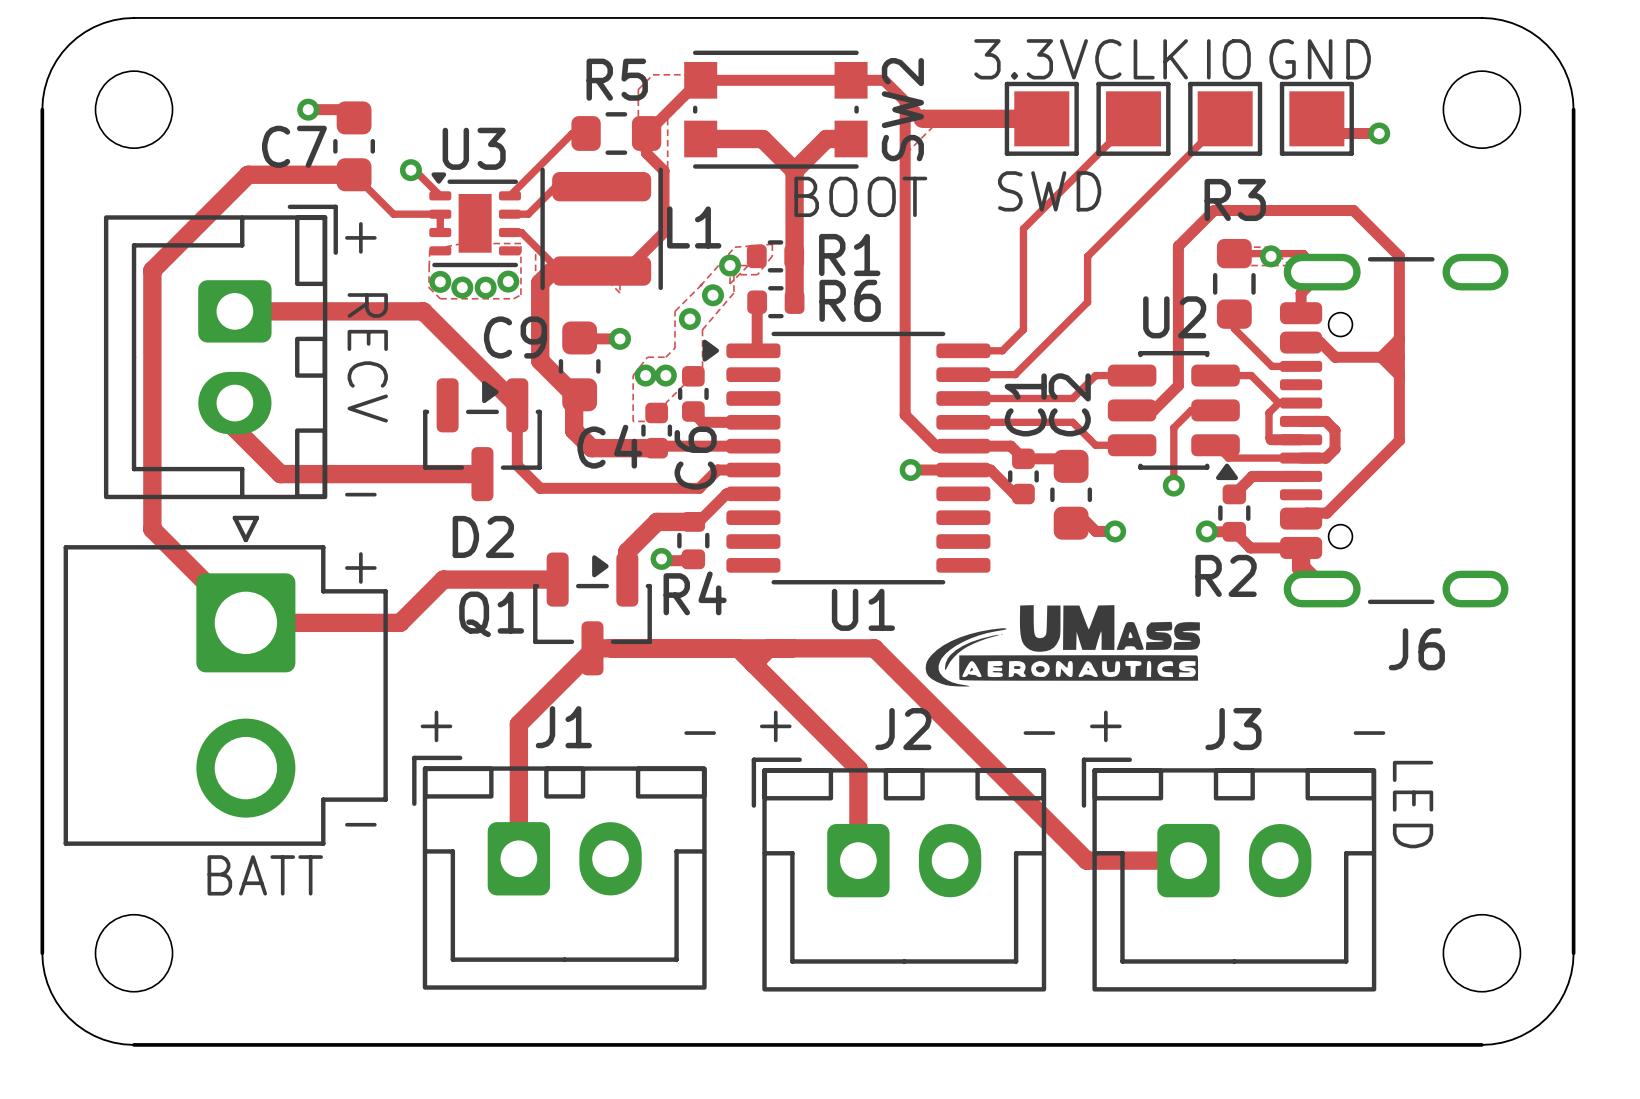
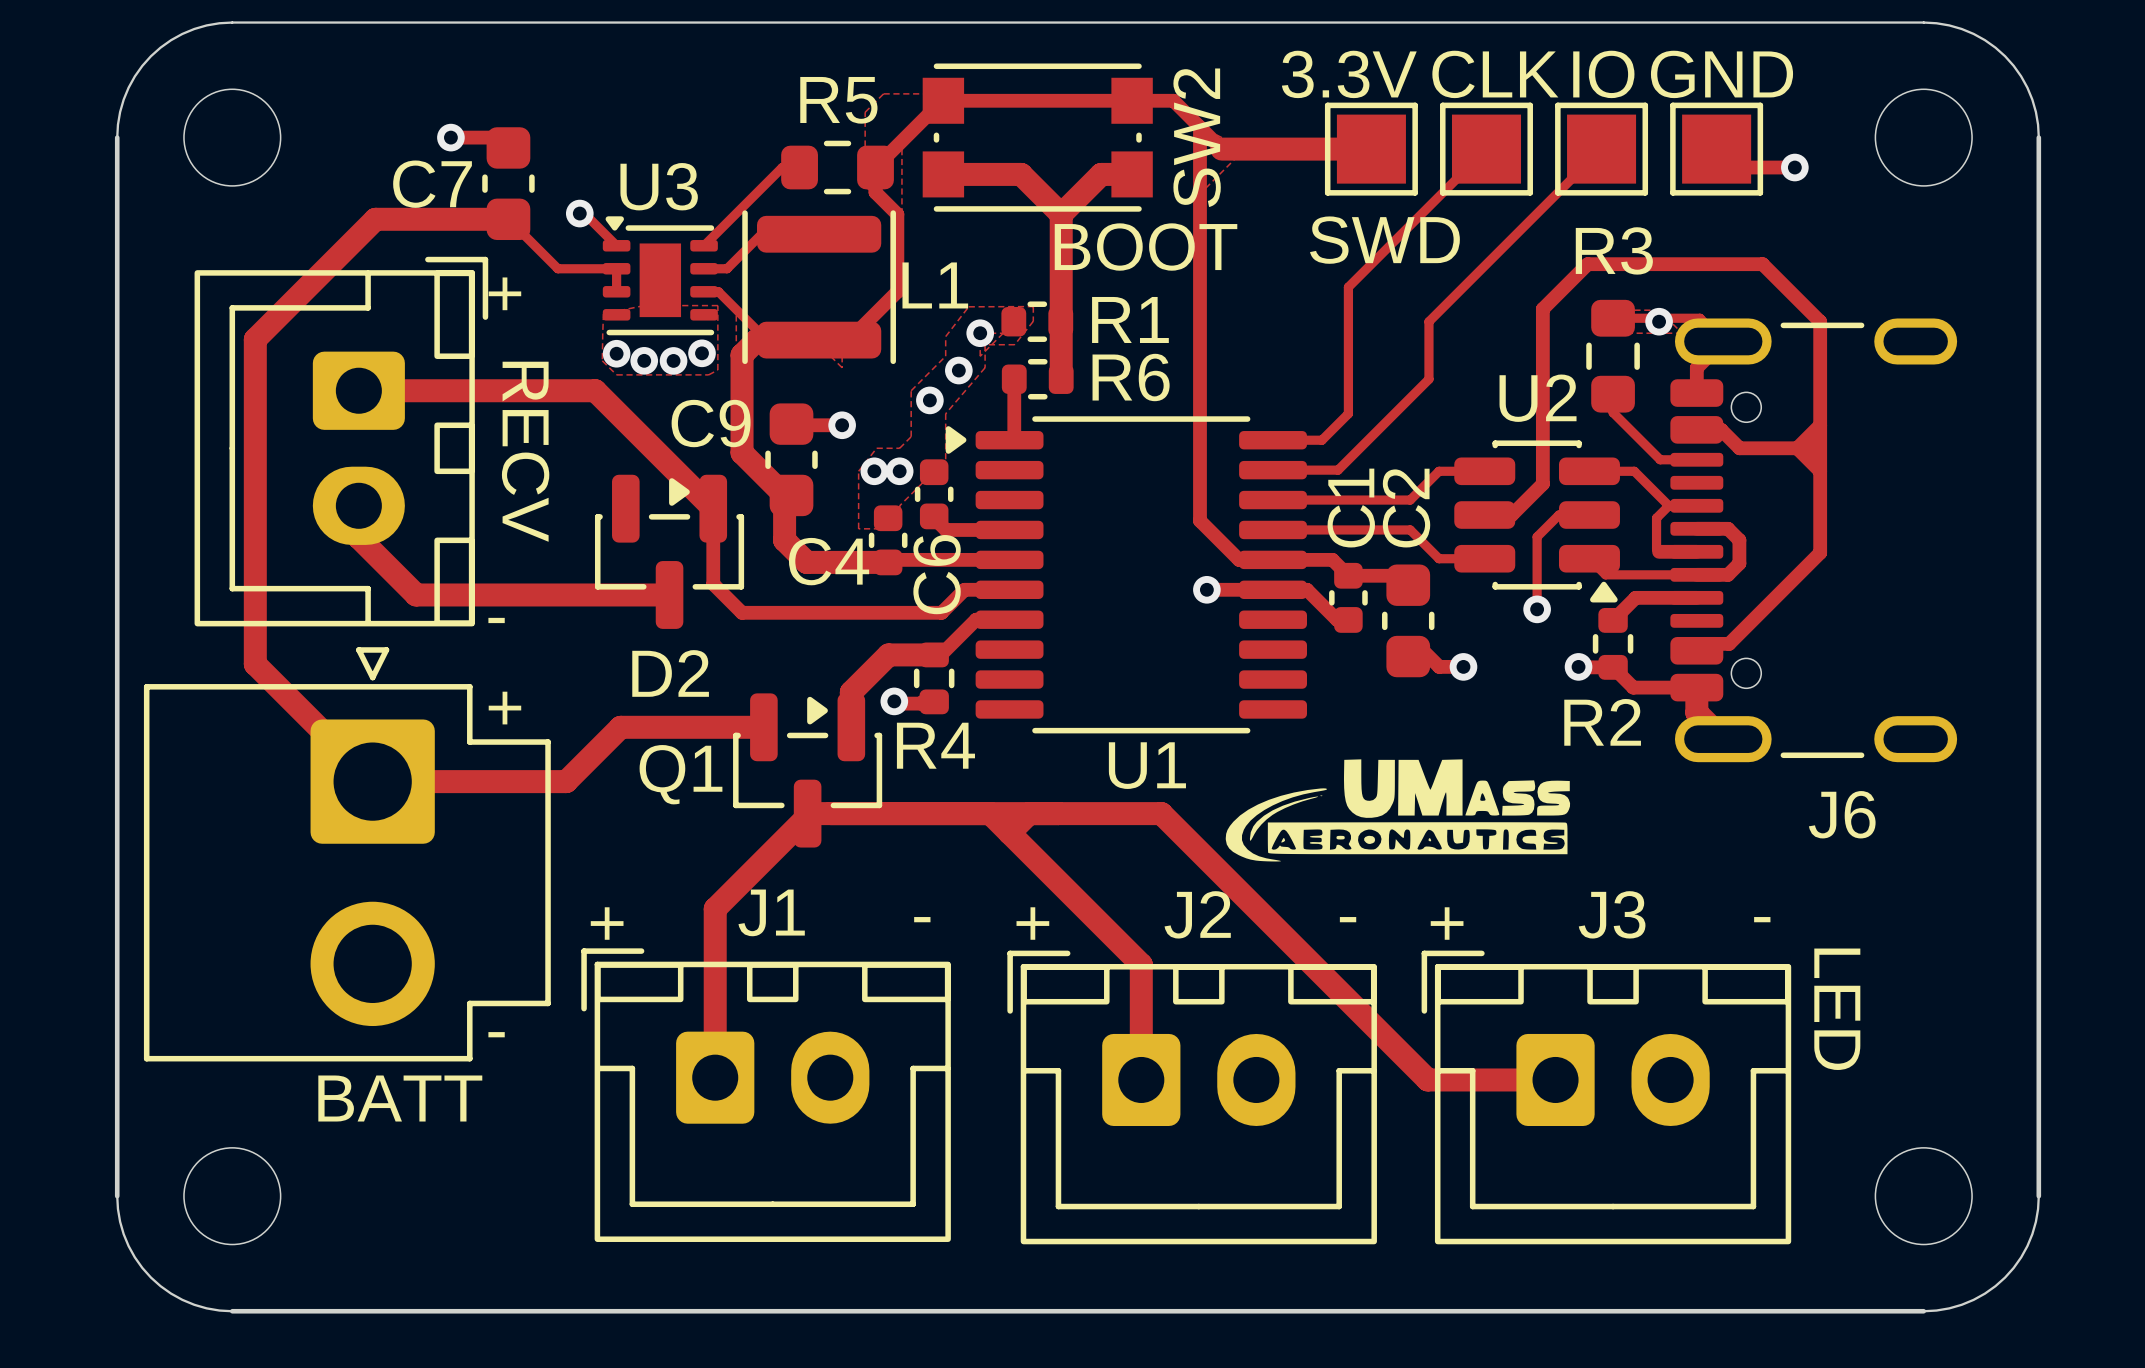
zone outline: (772, 244) (734, 247) (700, 286) (702, 283) -> (1033, 306) (968, 306) (945, 336) (945, 356)

